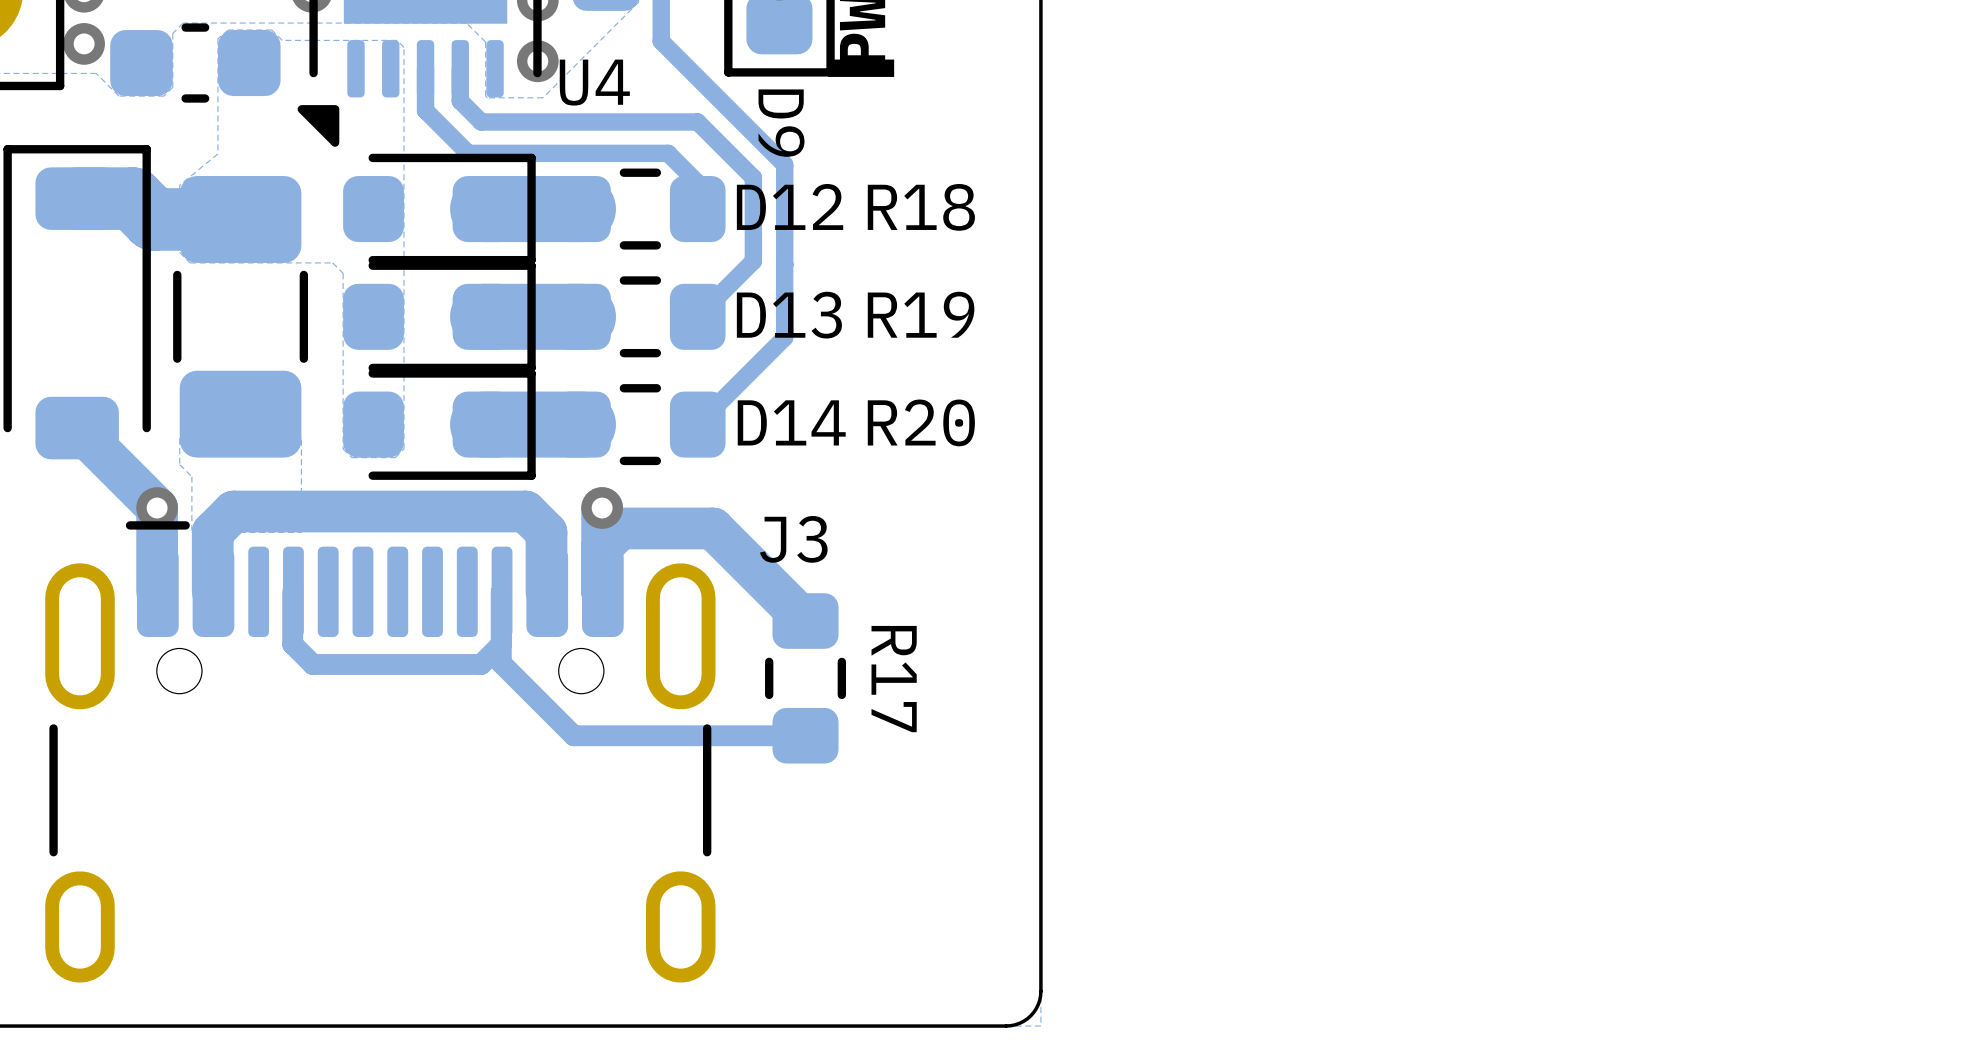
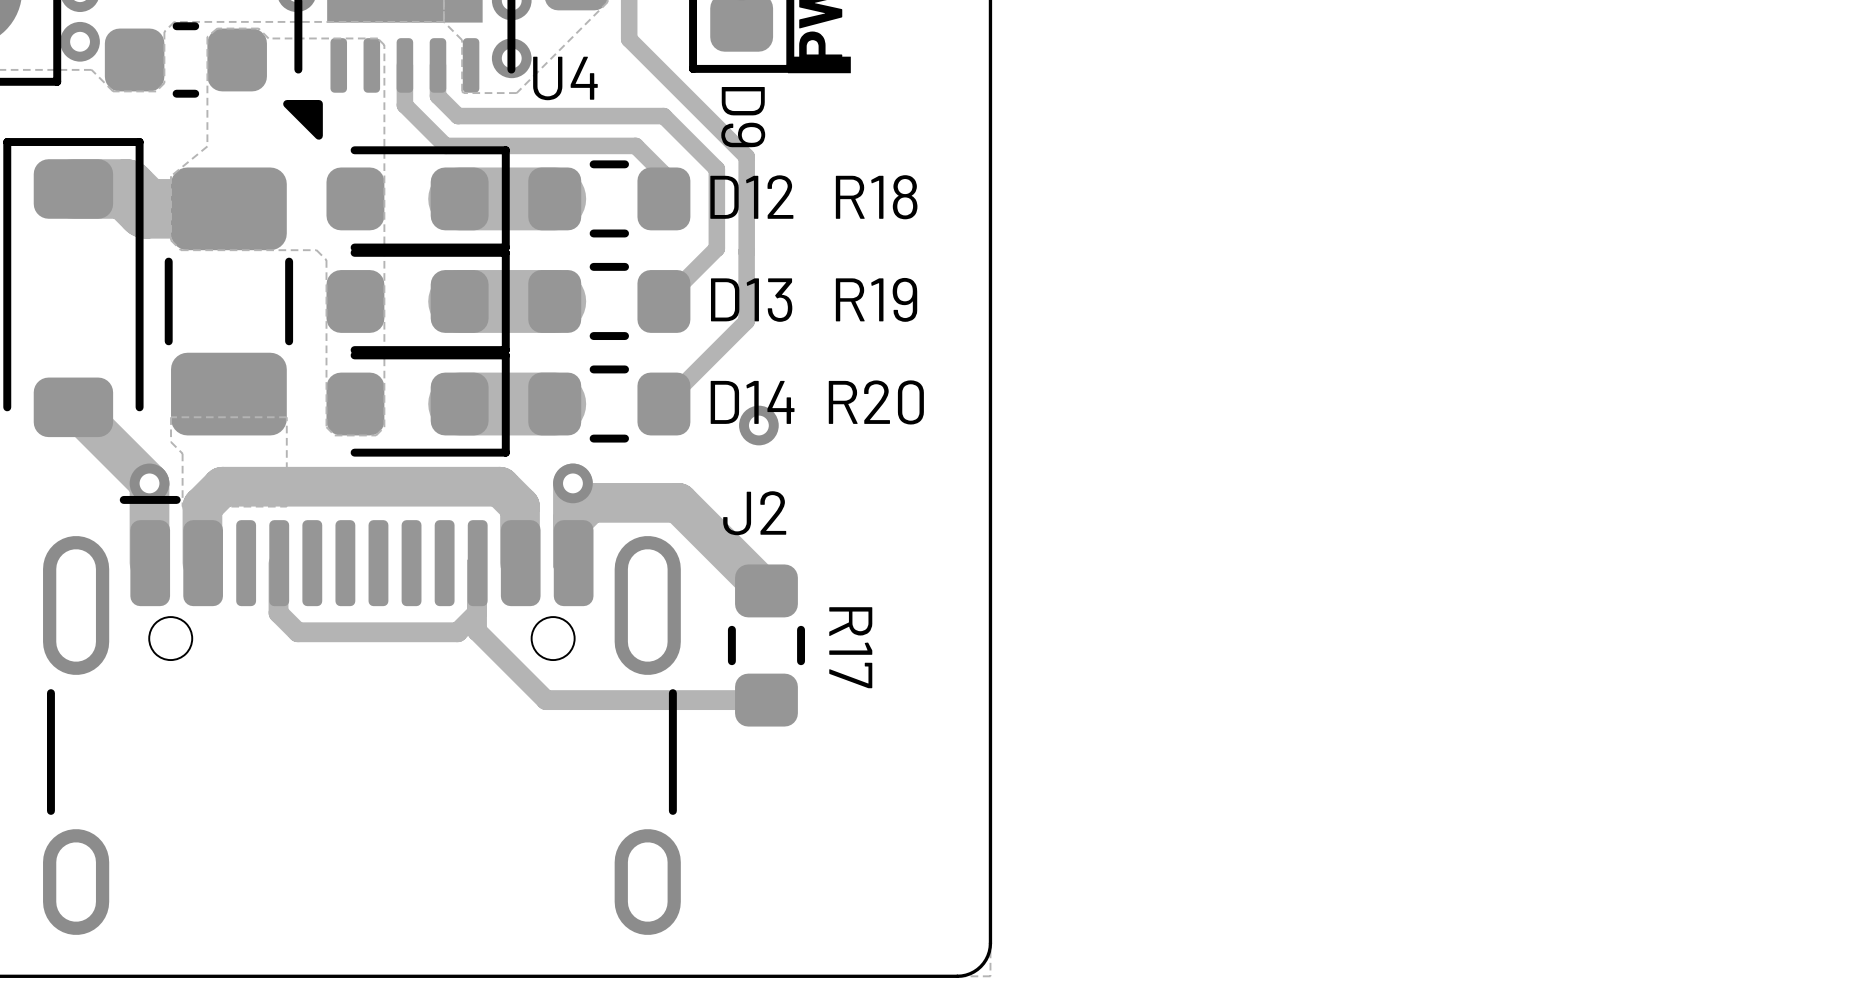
via: none -> (758, 425)
J3 name: J3 (793, 539) -> J2 (754, 513)

